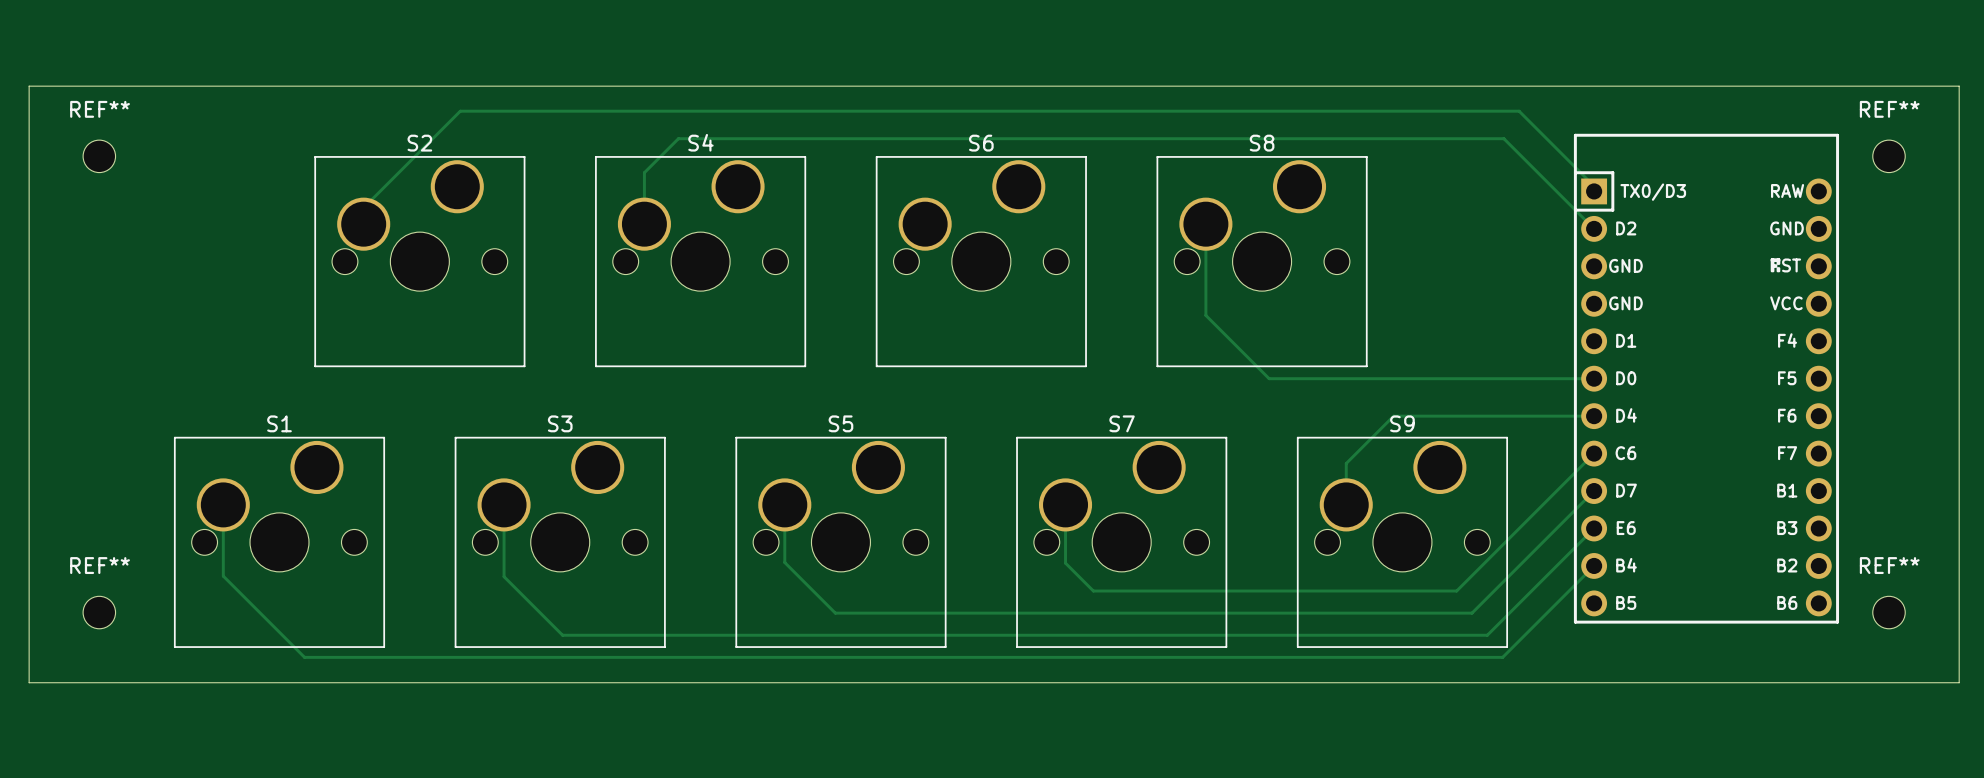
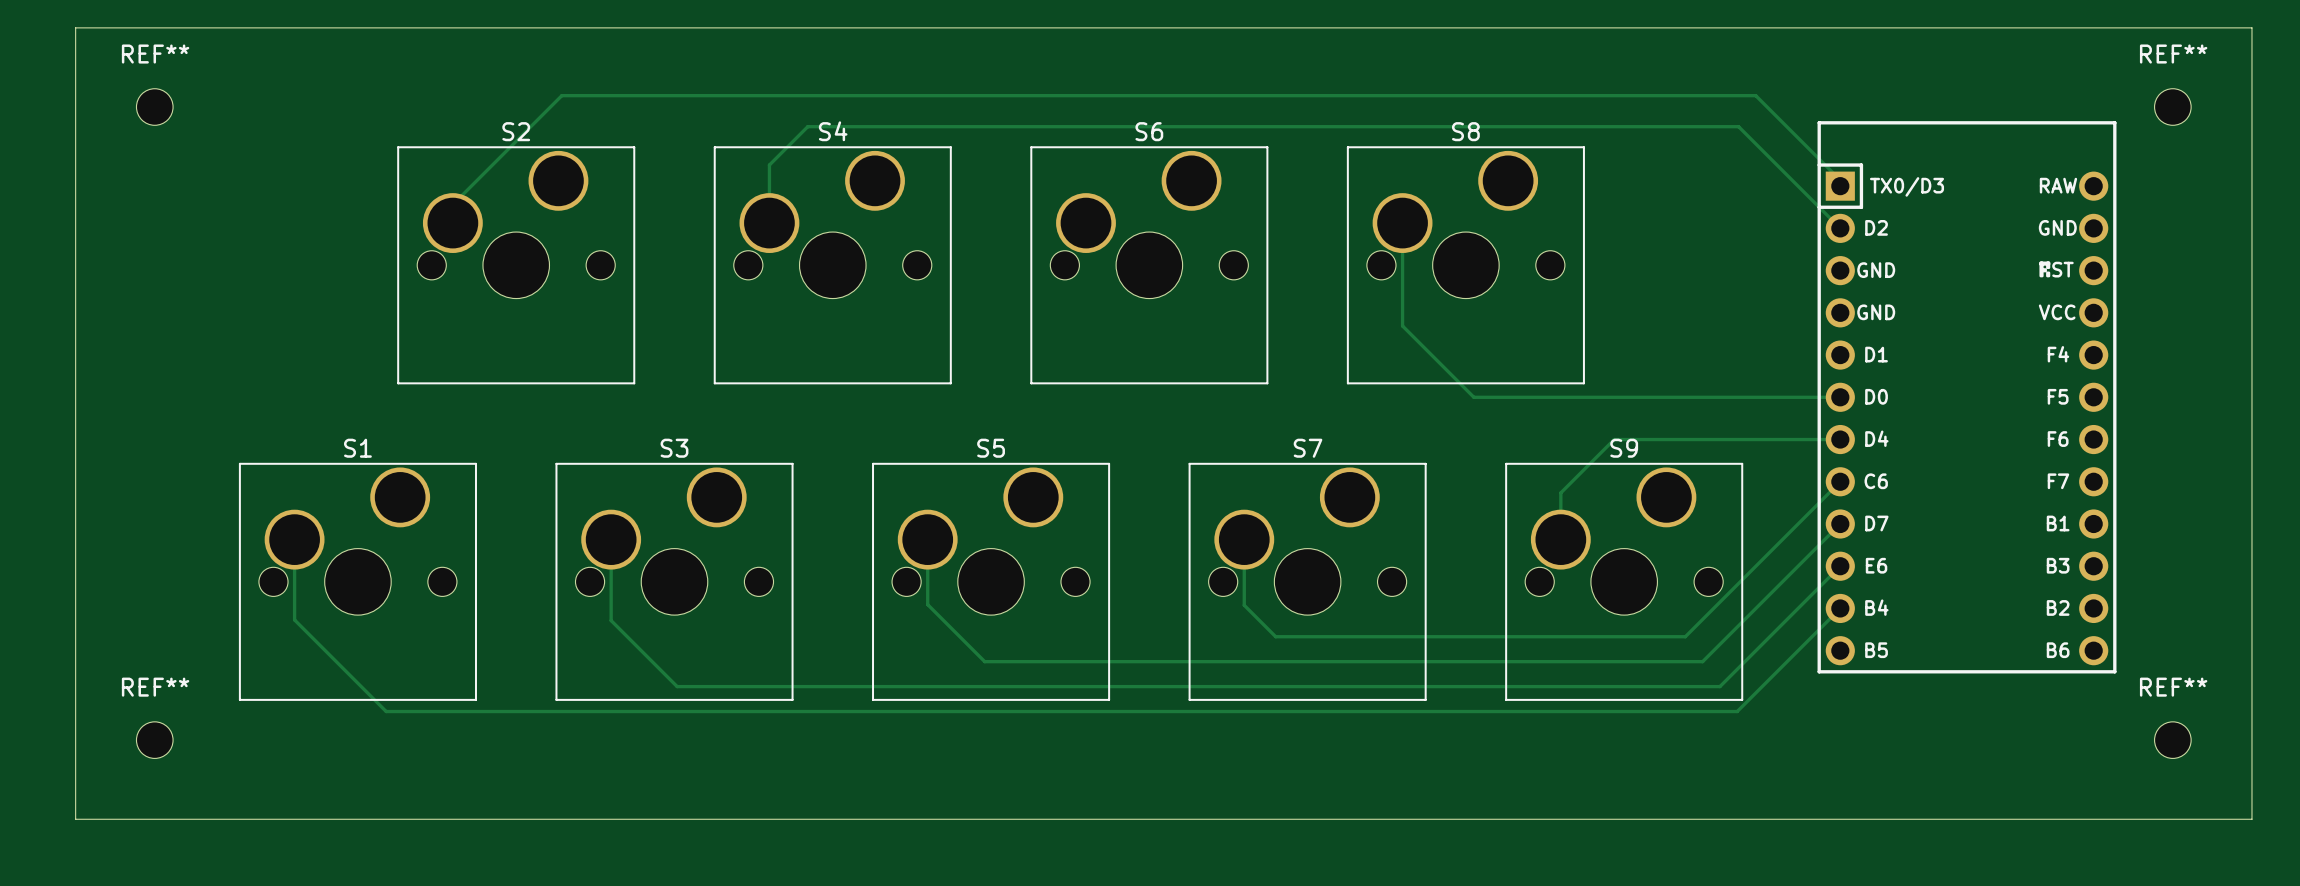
board edge: (29, 86) (1959, 86) -> (75, 67) (75, 27) (2251, 27) (2251, 67)
REF** position: (99, 156) -> (154, 107)
REF** position: (1889, 156) -> (2172, 107)
REF** position: (99, 612) -> (154, 740)
REF** position: (1889, 612) -> (2172, 740)
board edge: (29, 682) (1959, 682) -> (75, 740) (75, 819) (2251, 819) (2251, 740)

